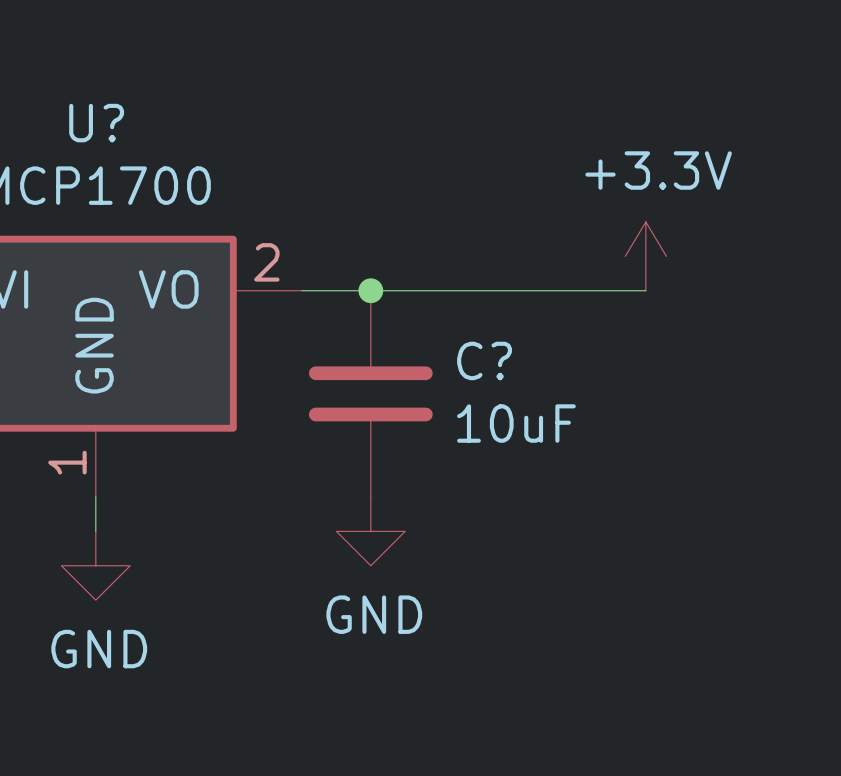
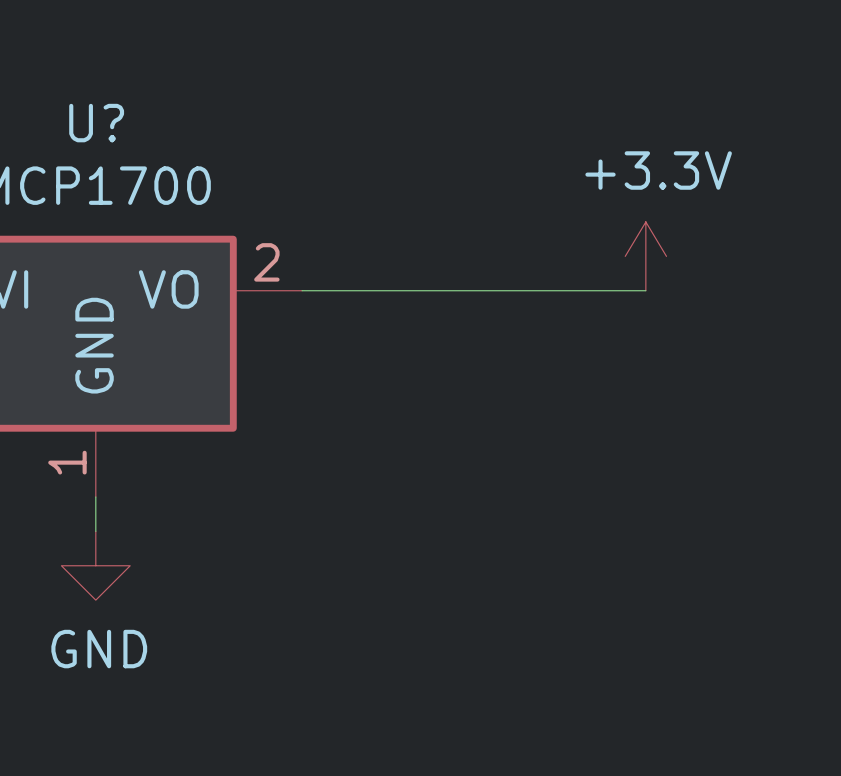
junction: (370, 290) -> none
C?: 10uF (370, 393) -> none
power symbol: GND (370, 531) -> none

